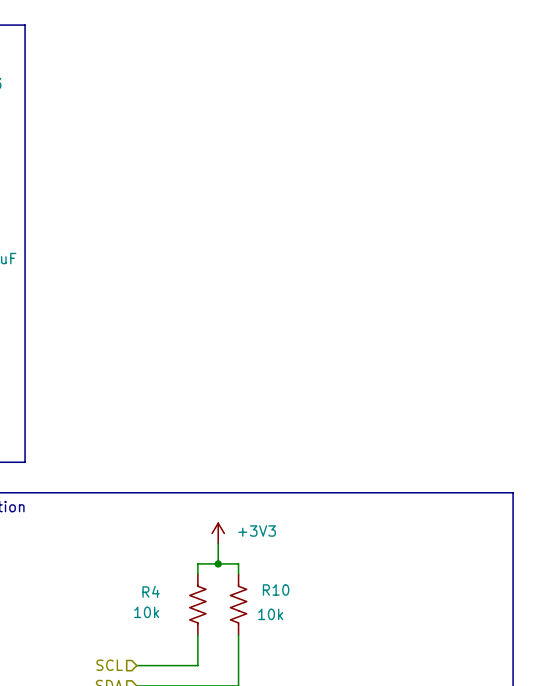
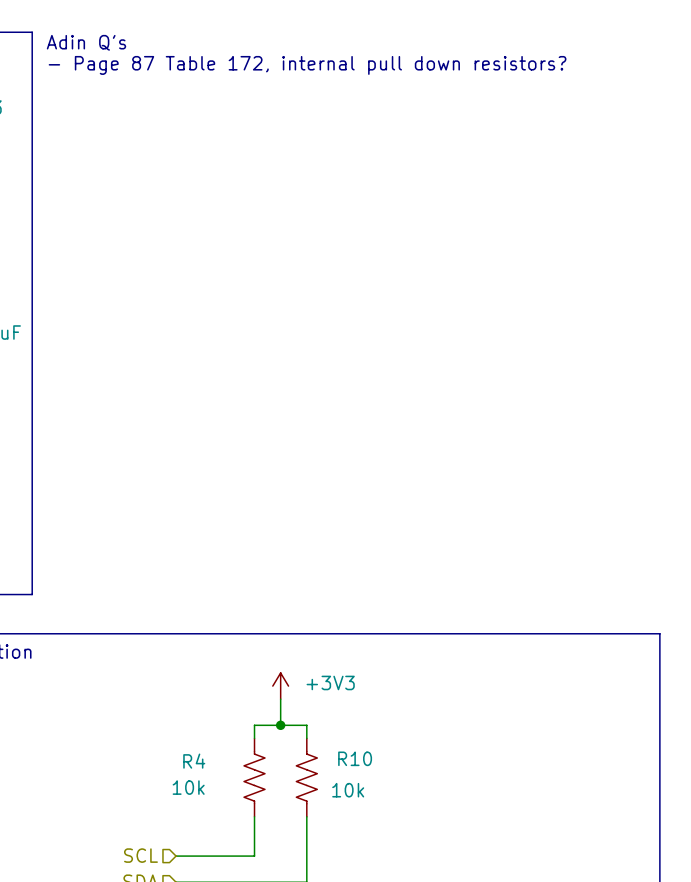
text: none -> Adin Q's (86, 42)
text: none -> - Page 87 Table 172, internal pull down resistors? (307, 65)

